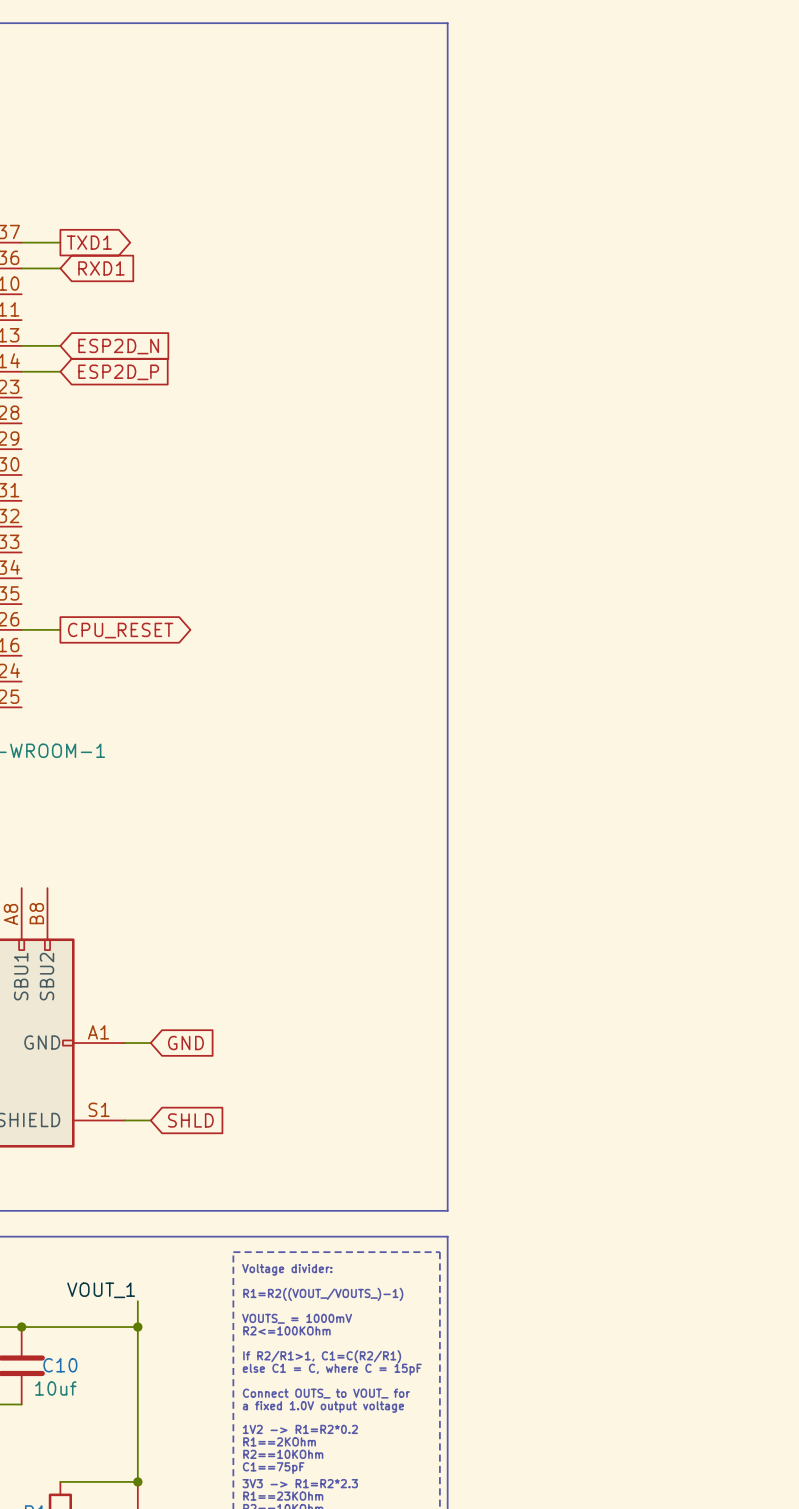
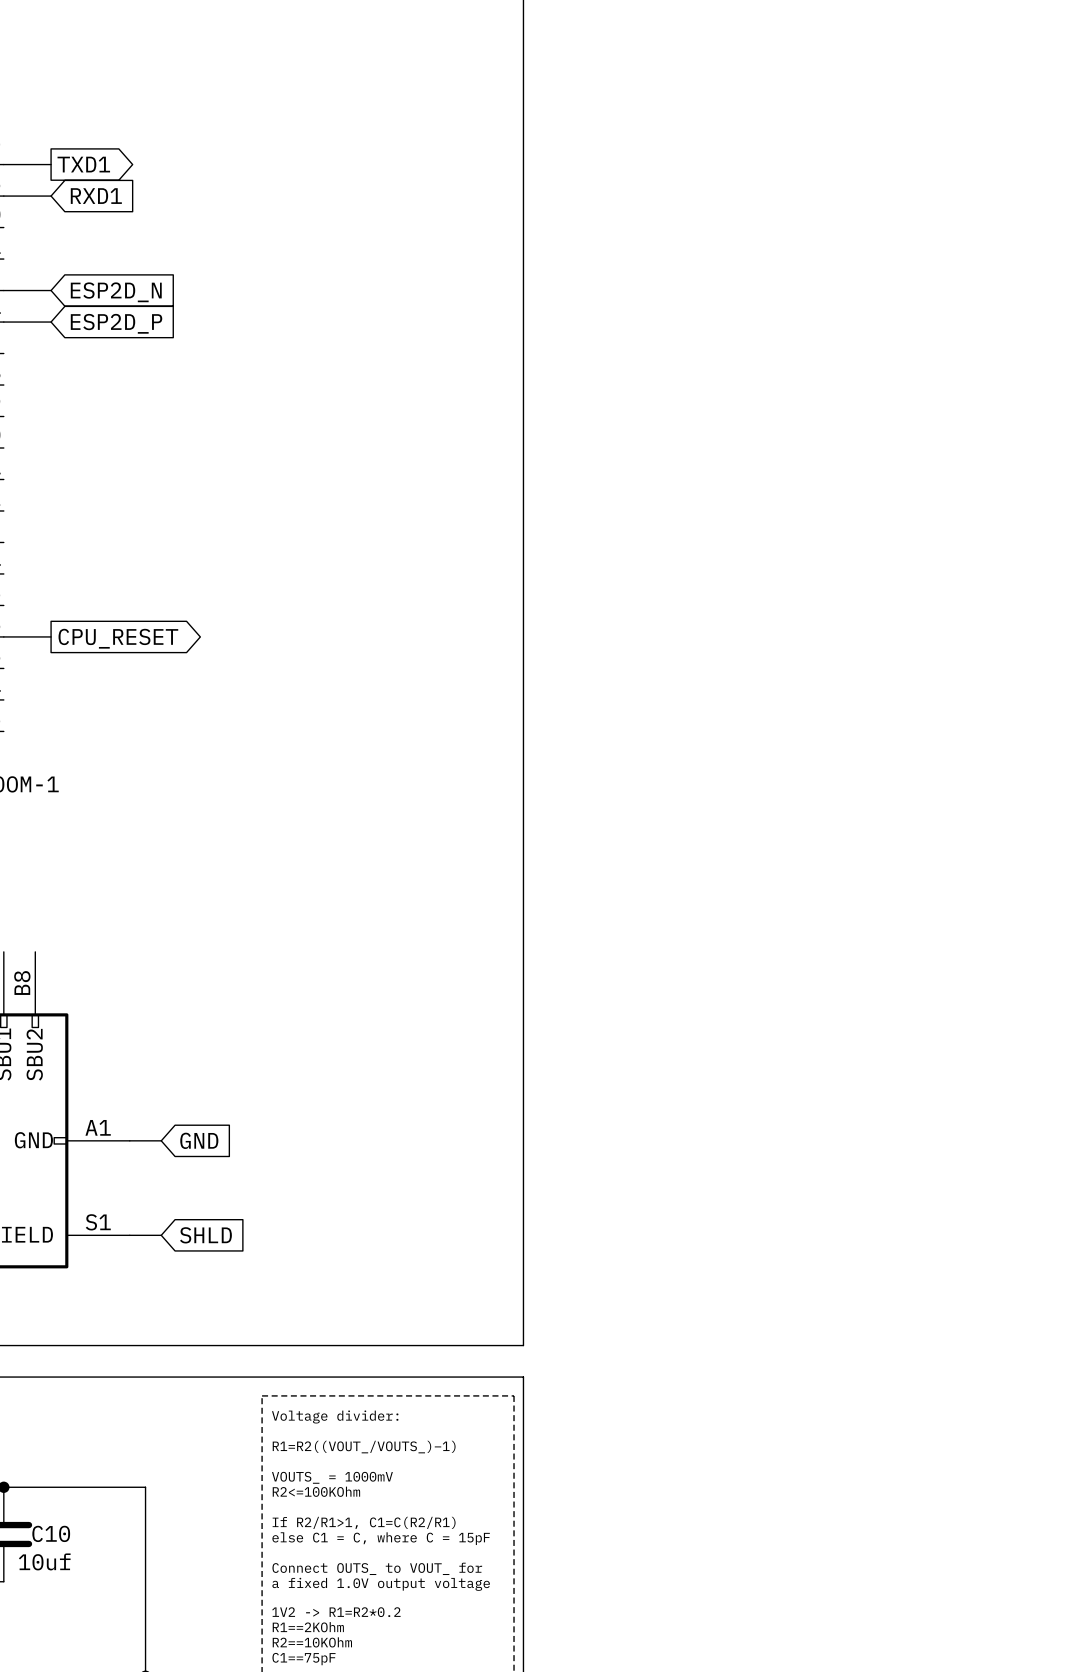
label: VOUT_1 (101, 1290) -> none
wire: (137, 1301) (137, 1327) -> none
junction: (137, 1327) -> none

